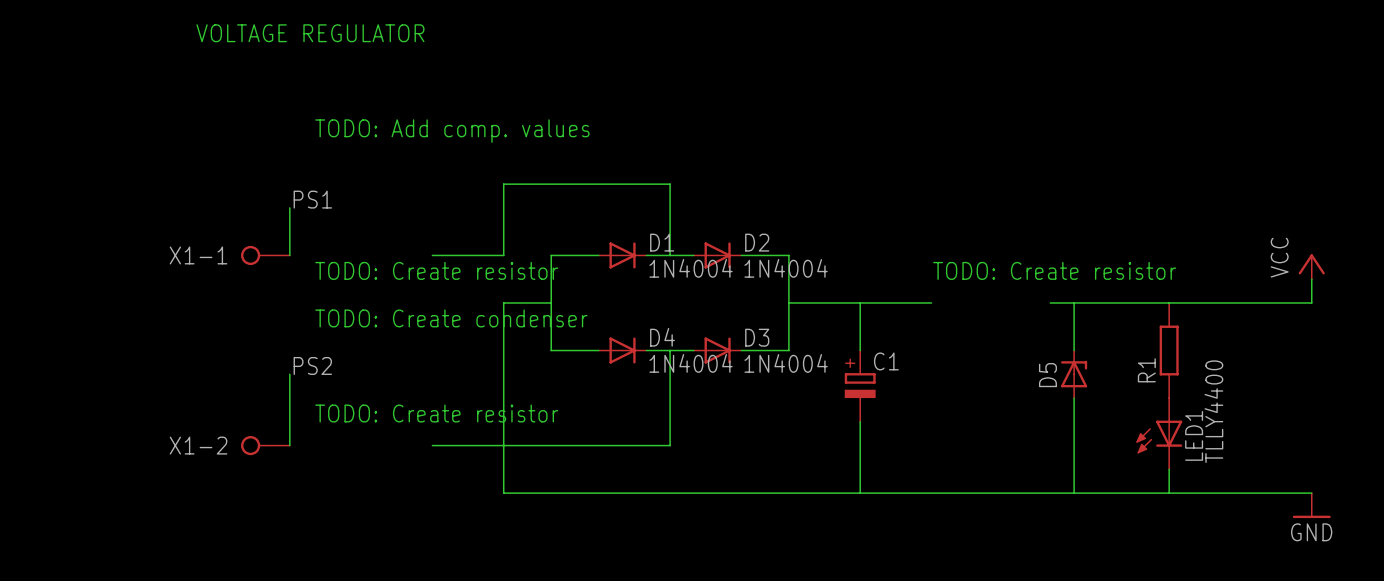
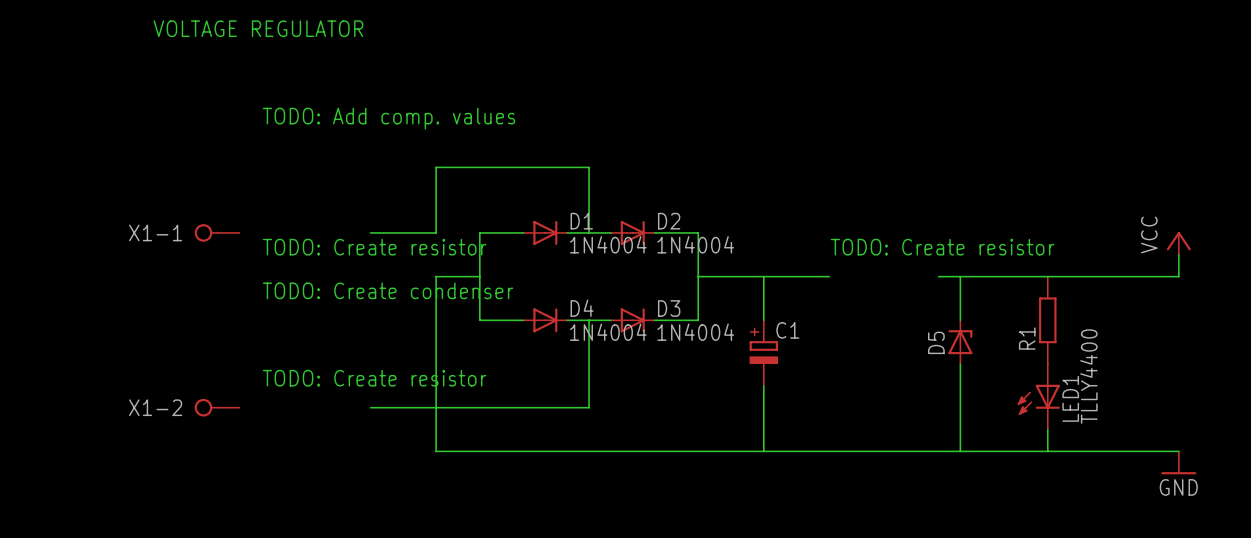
label: PS1 (312, 199) -> none
wire: (289, 207) (289, 255) -> none
label: PS2 (312, 365) -> none
wire: (289, 374) (289, 445) -> none

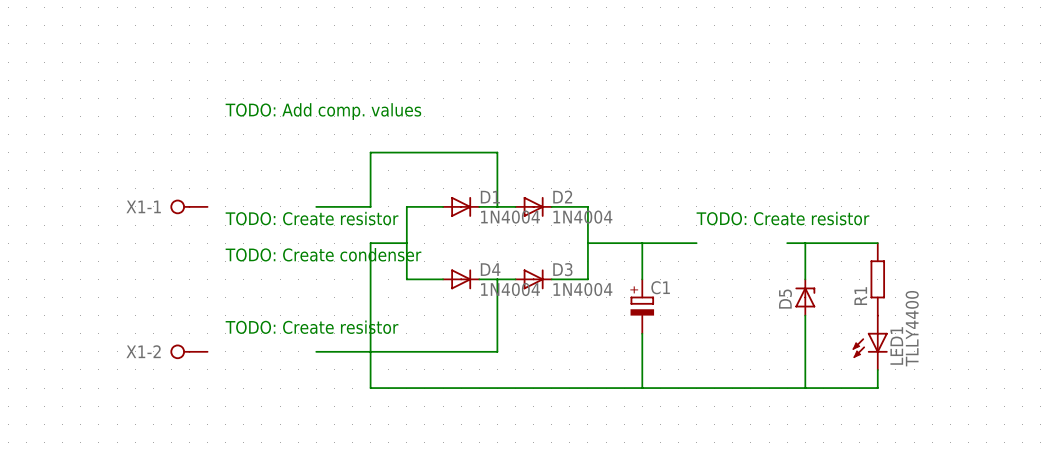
text: VOLTAGE REGULATOR (258, 28) -> none
power symbol: VCC (1178, 243) -> none
wire: (1178, 254) (1178, 276) (1047, 276) -> none
wire: (1047, 451) (1178, 451) -> none
power symbol: GND (1178, 462) -> none

